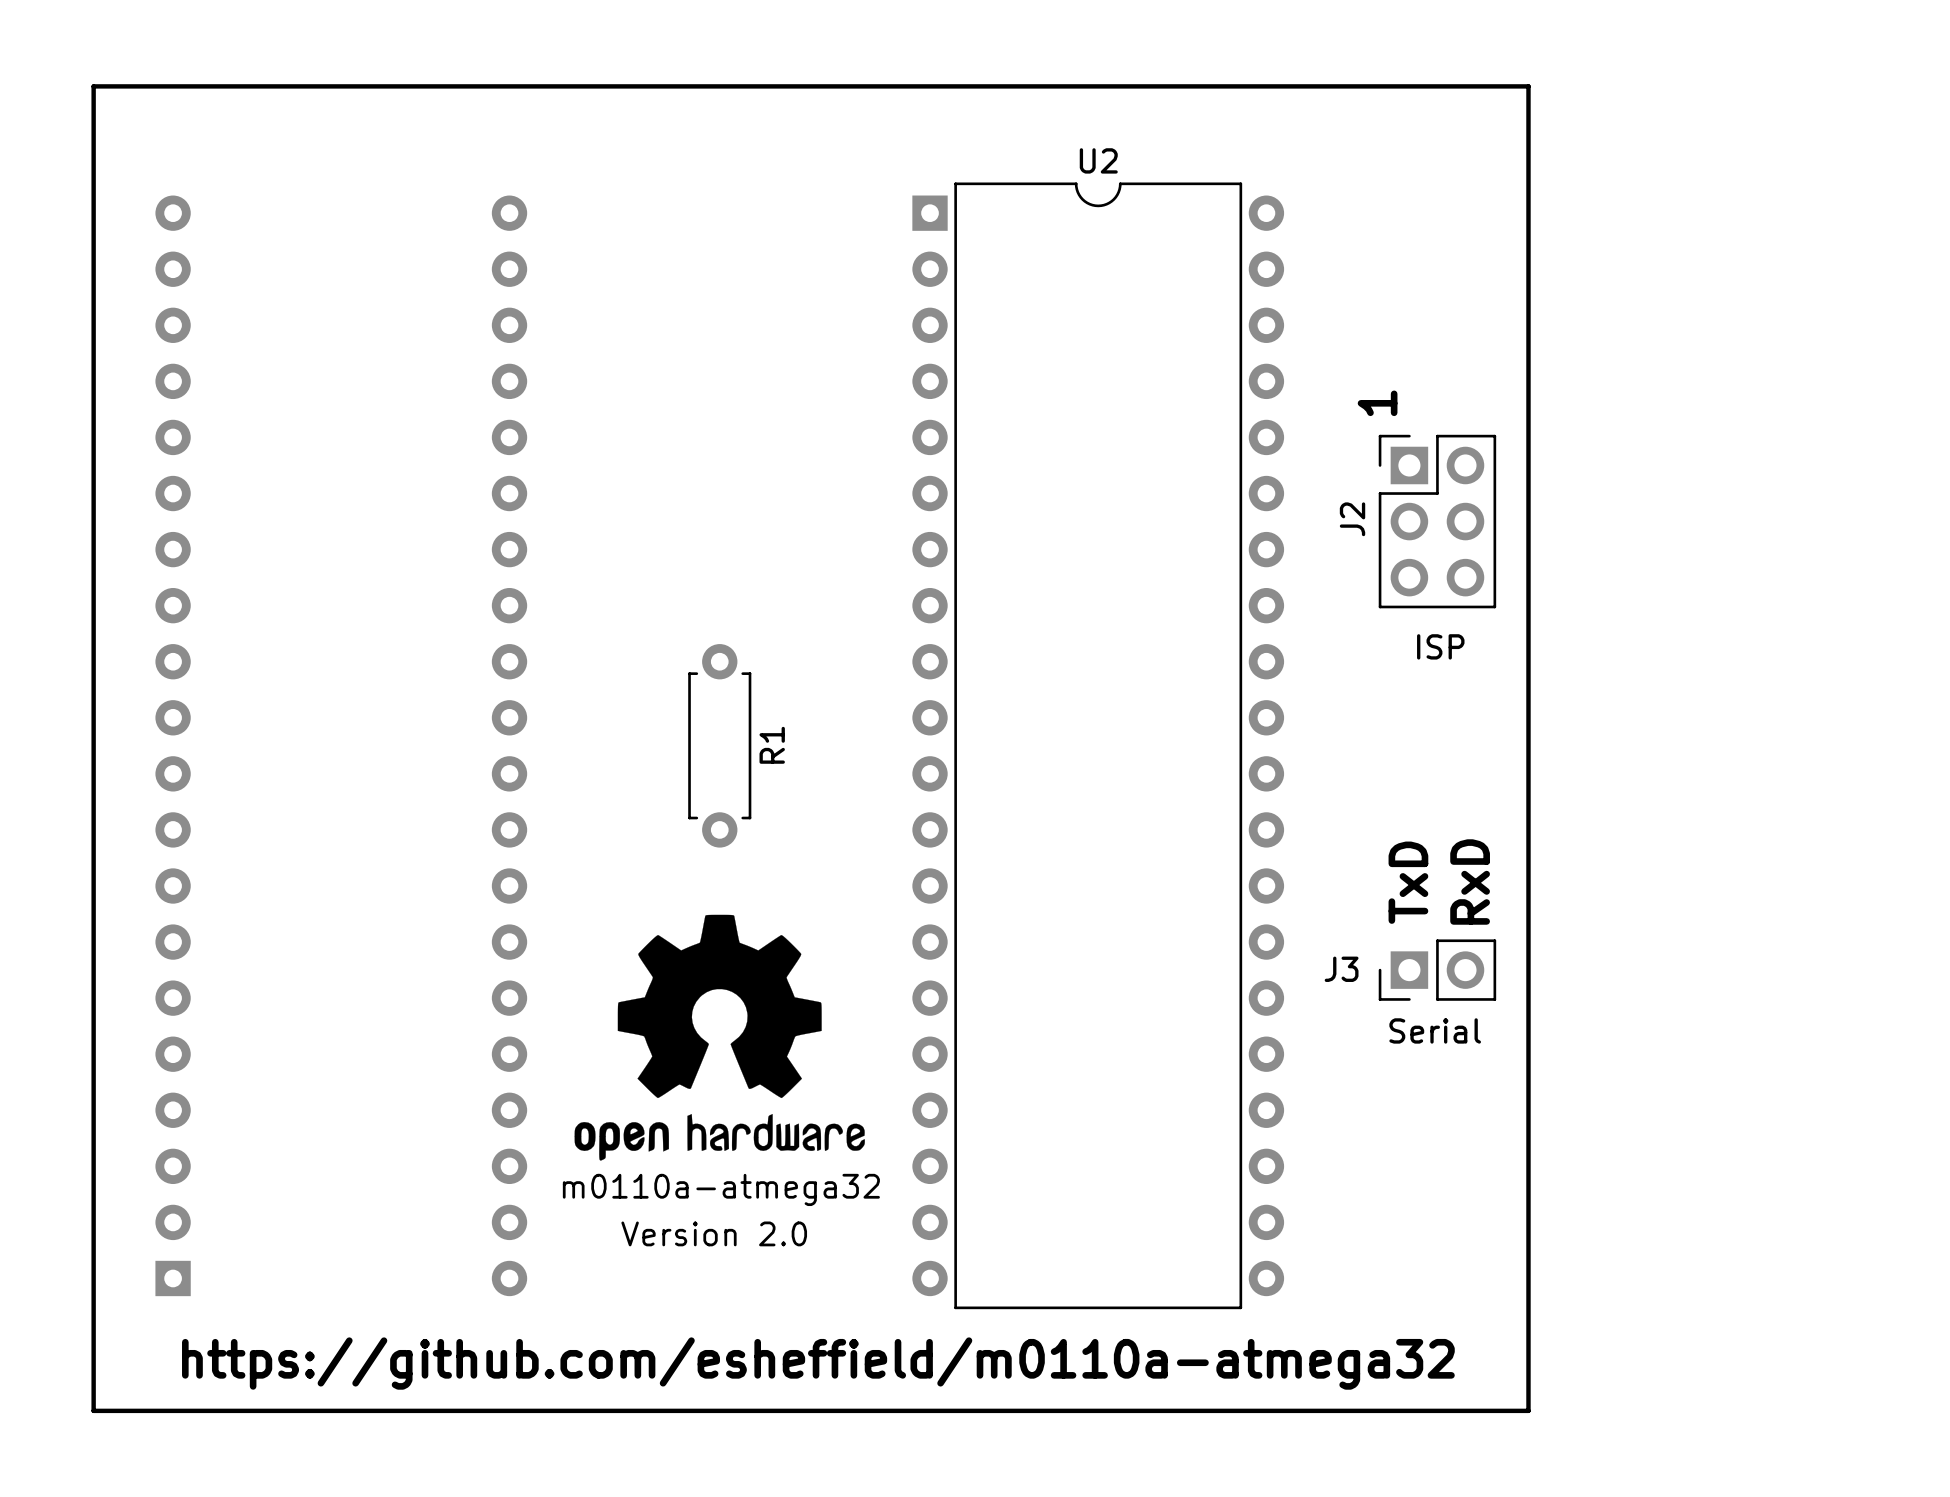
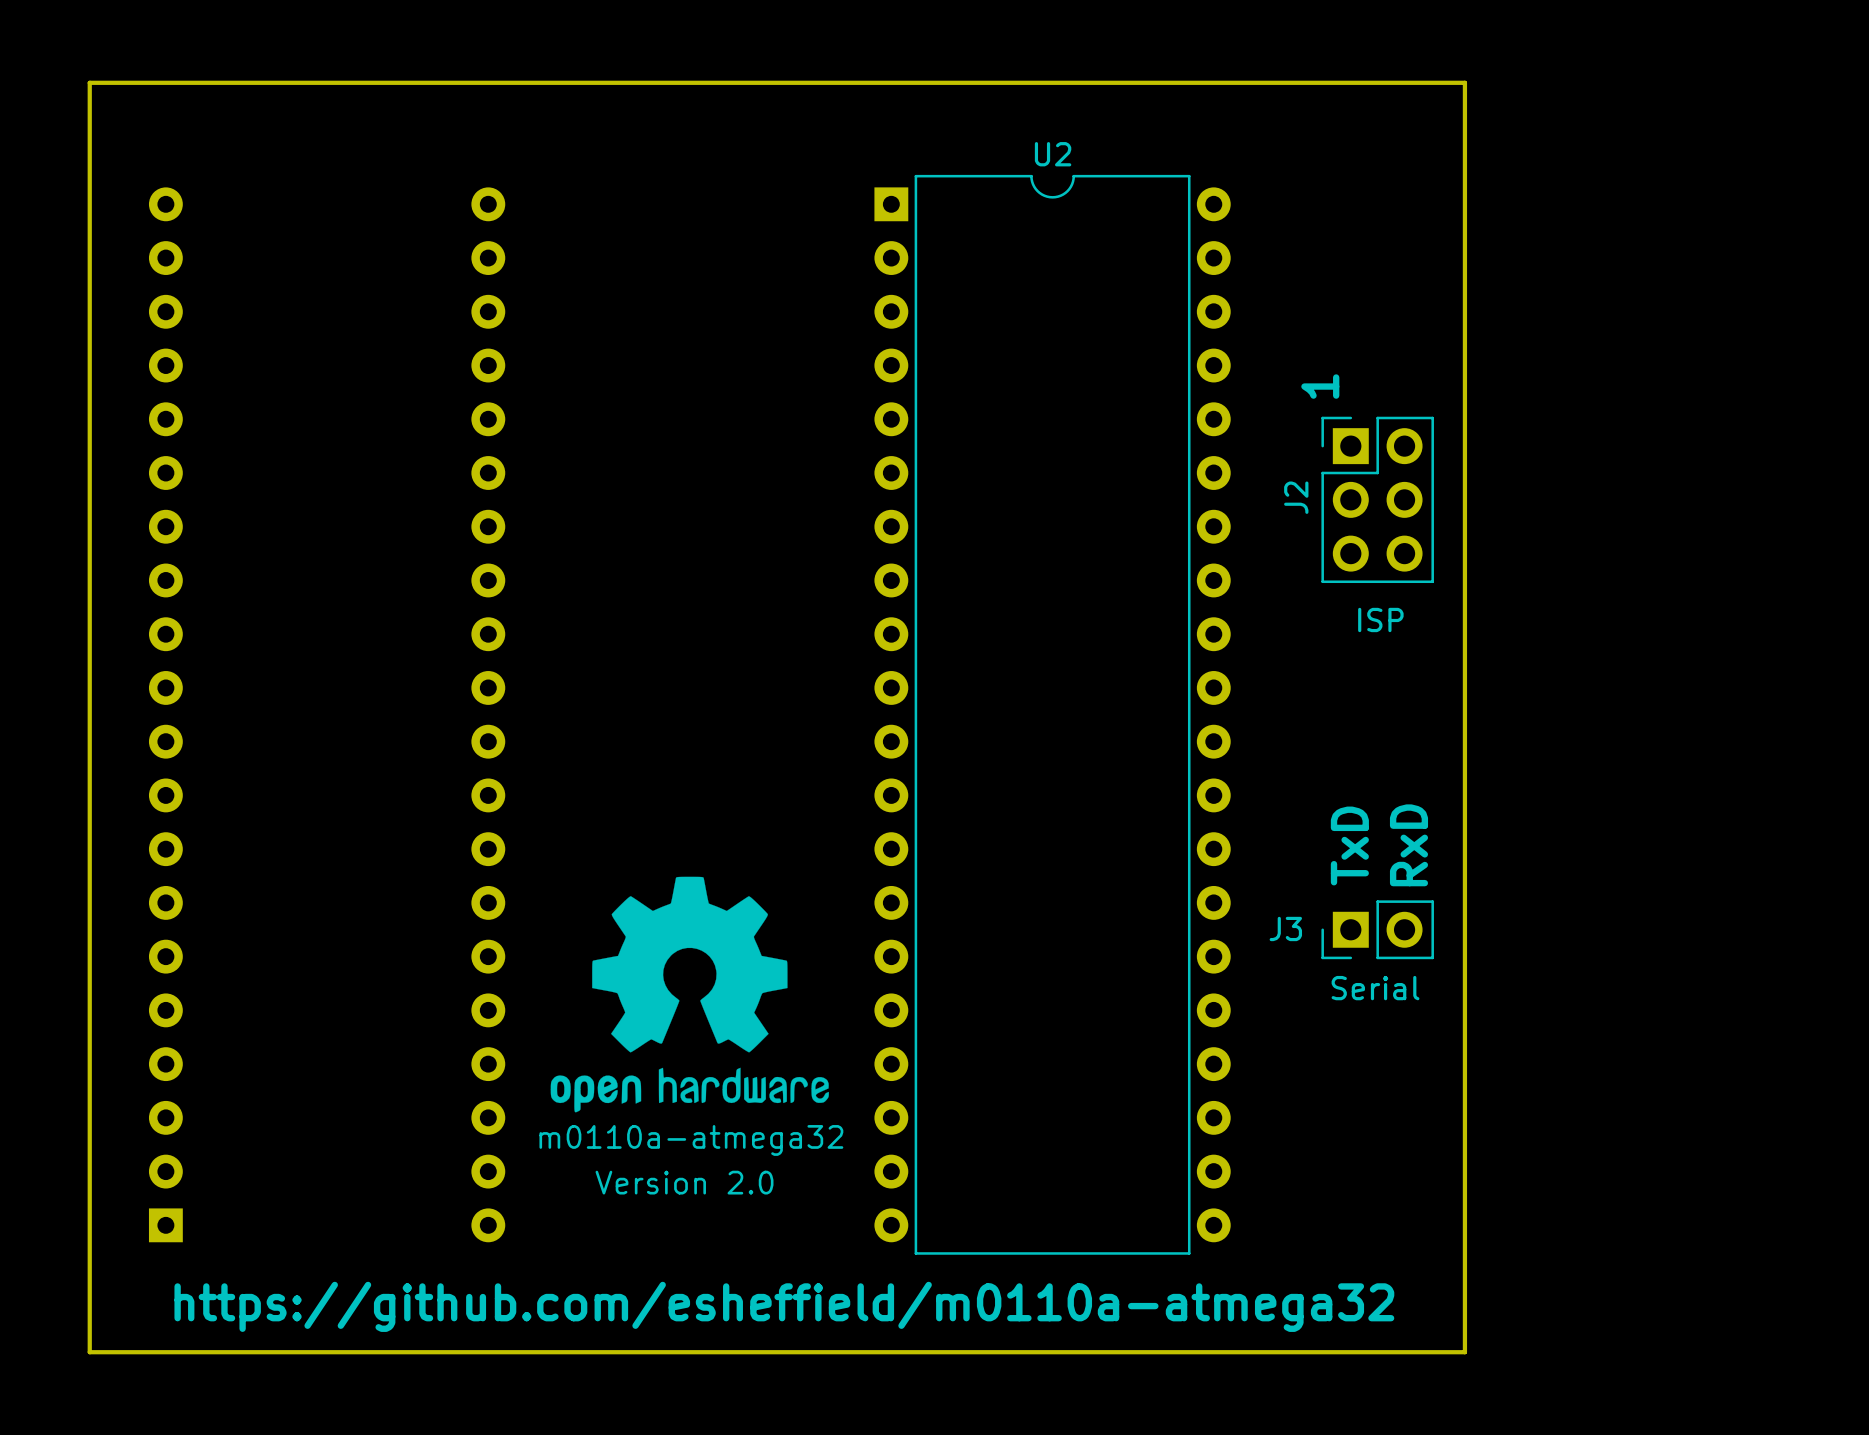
R1: (719, 745) -> none

